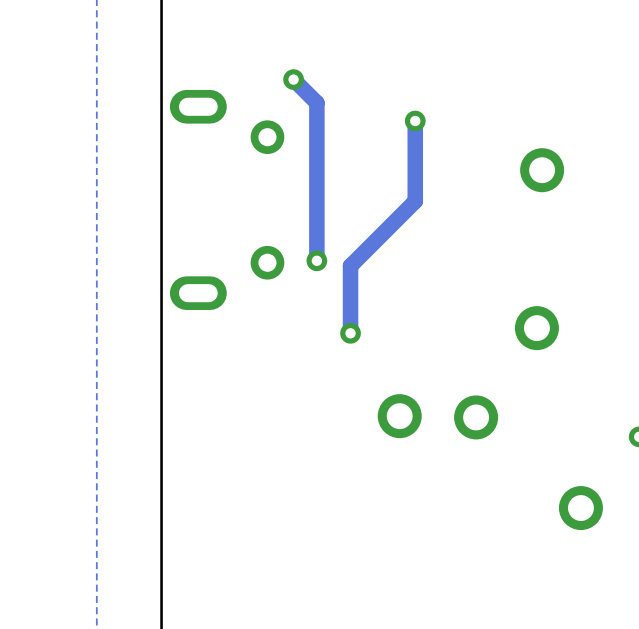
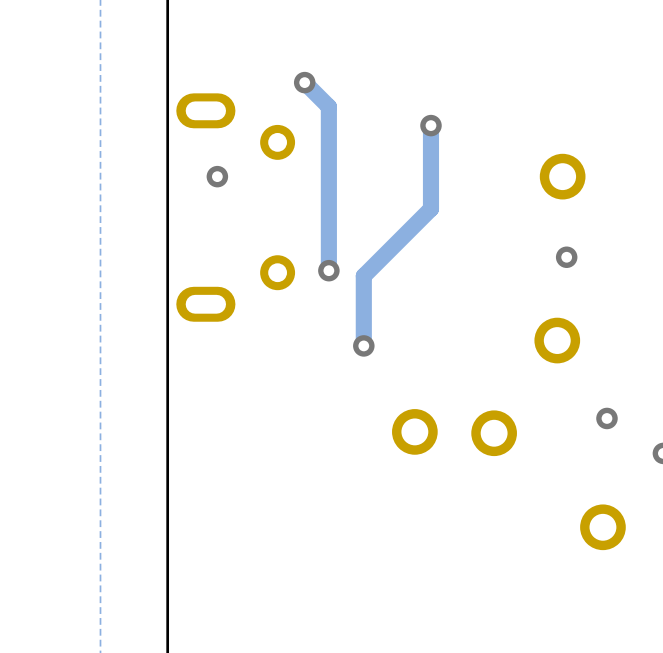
via: none -> (217, 176)
via: none -> (566, 257)
via: none -> (606, 418)

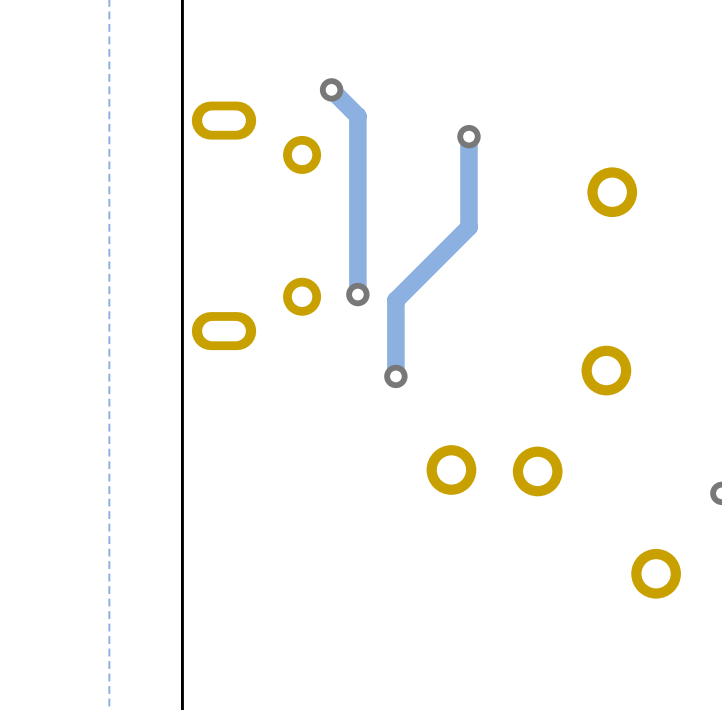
via: (217, 176) -> none
via: (566, 257) -> none
via: (606, 418) -> none

